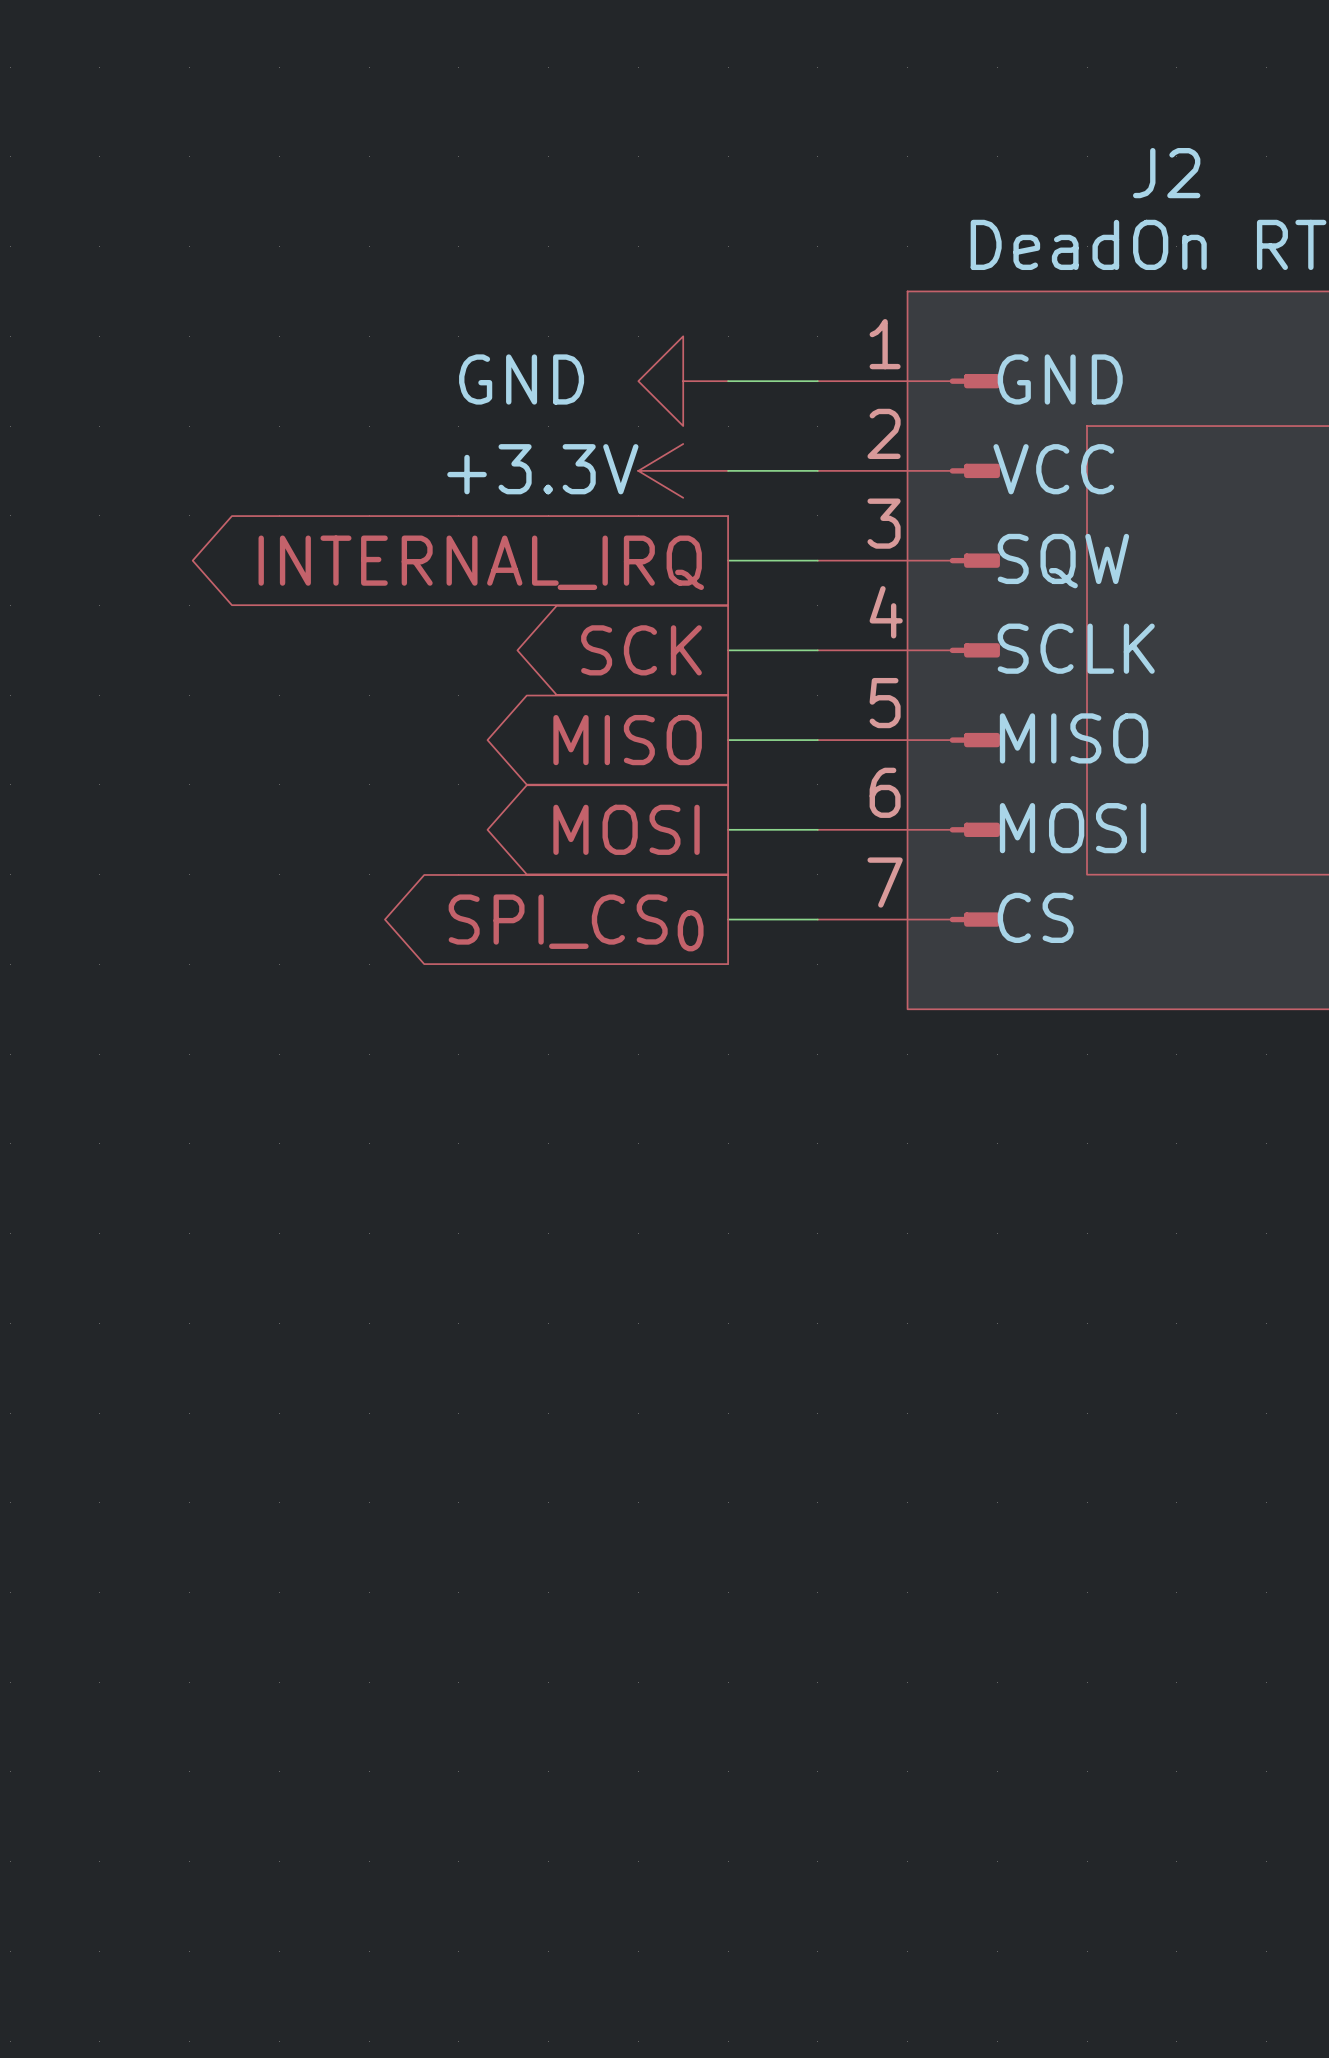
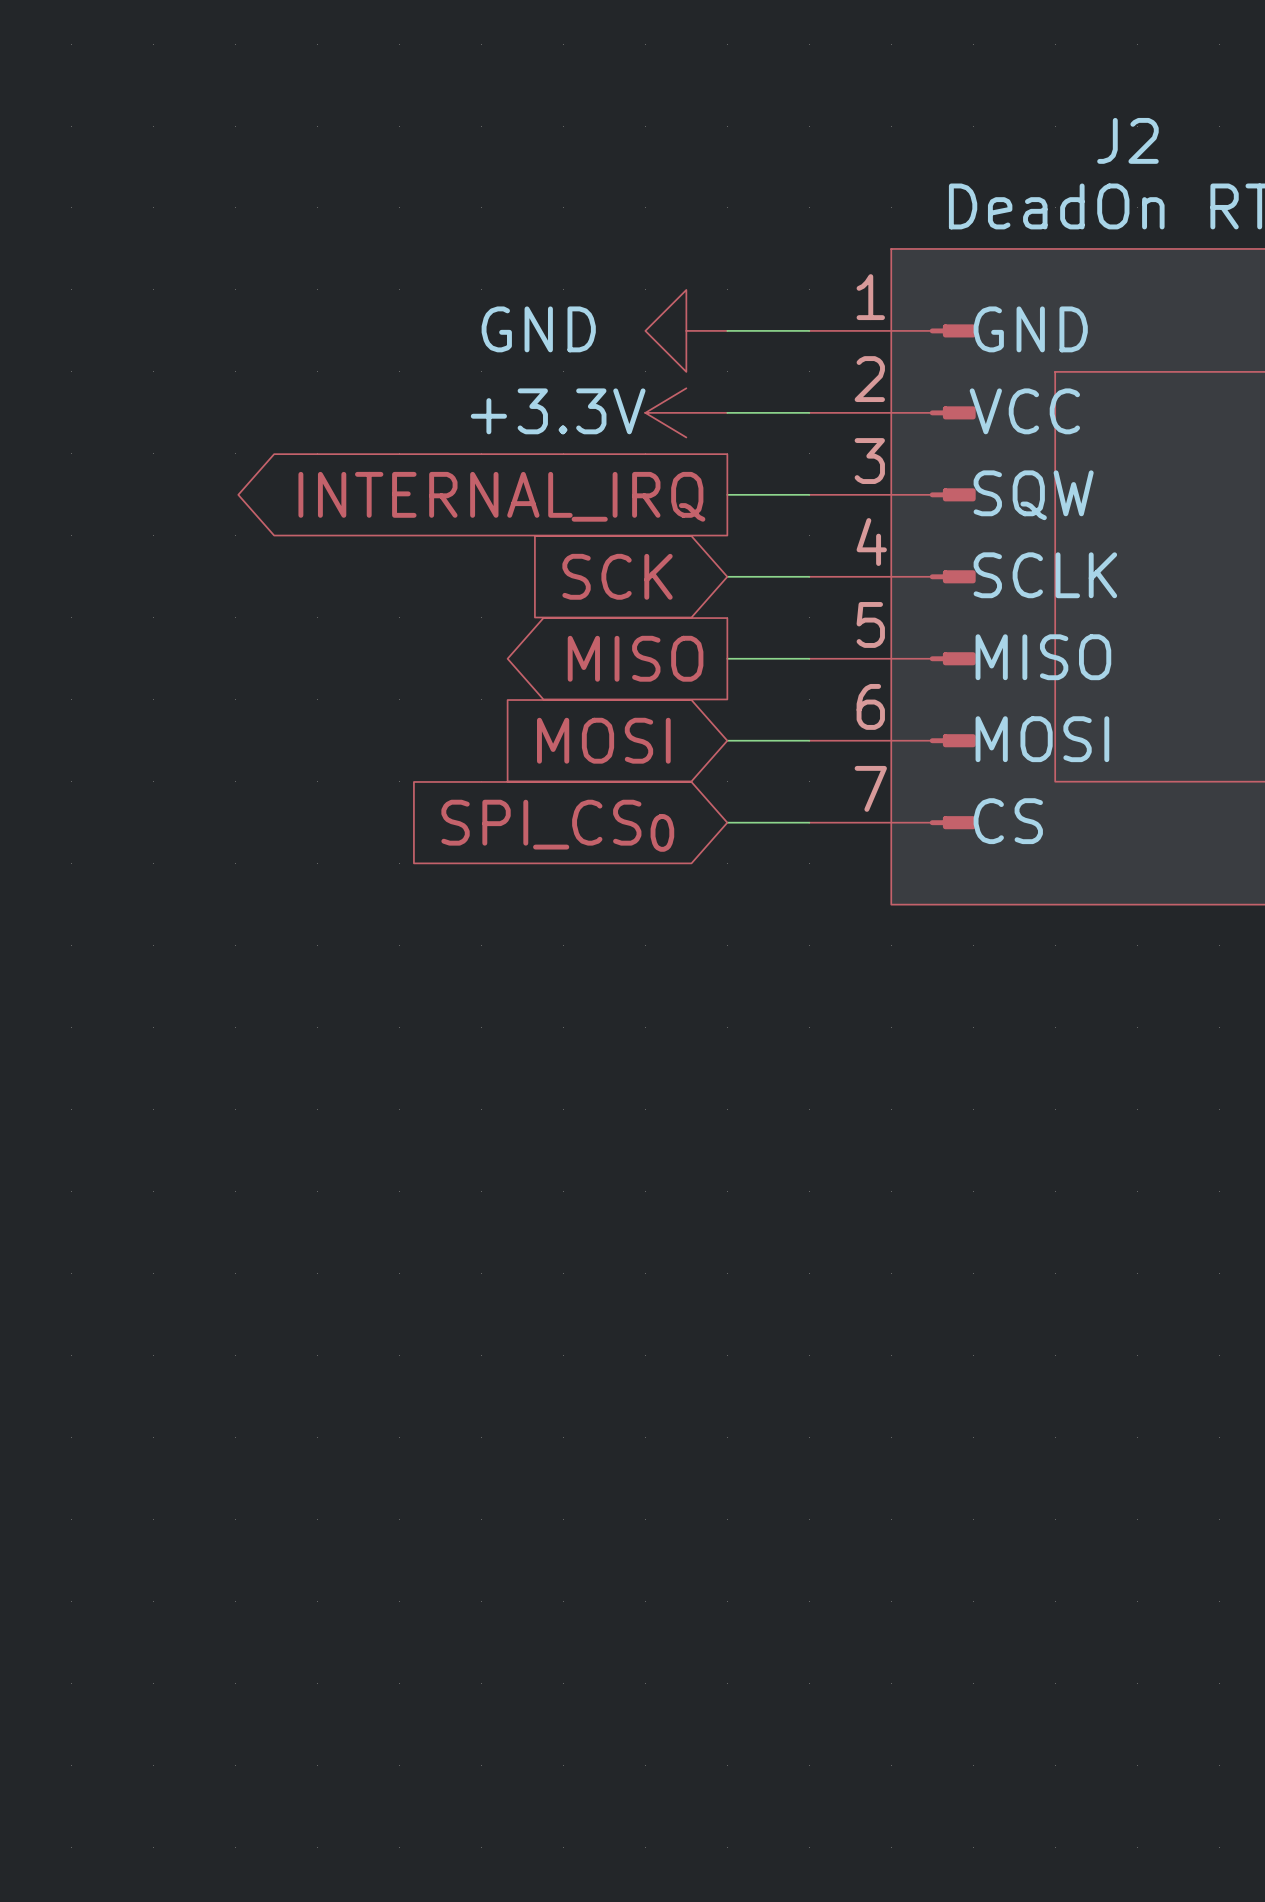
global label shape: output (641, 650) -> input (617, 576)
global label shape: output (626, 829) -> input (603, 740)
global label shape: output (576, 922) -> input (557, 825)

